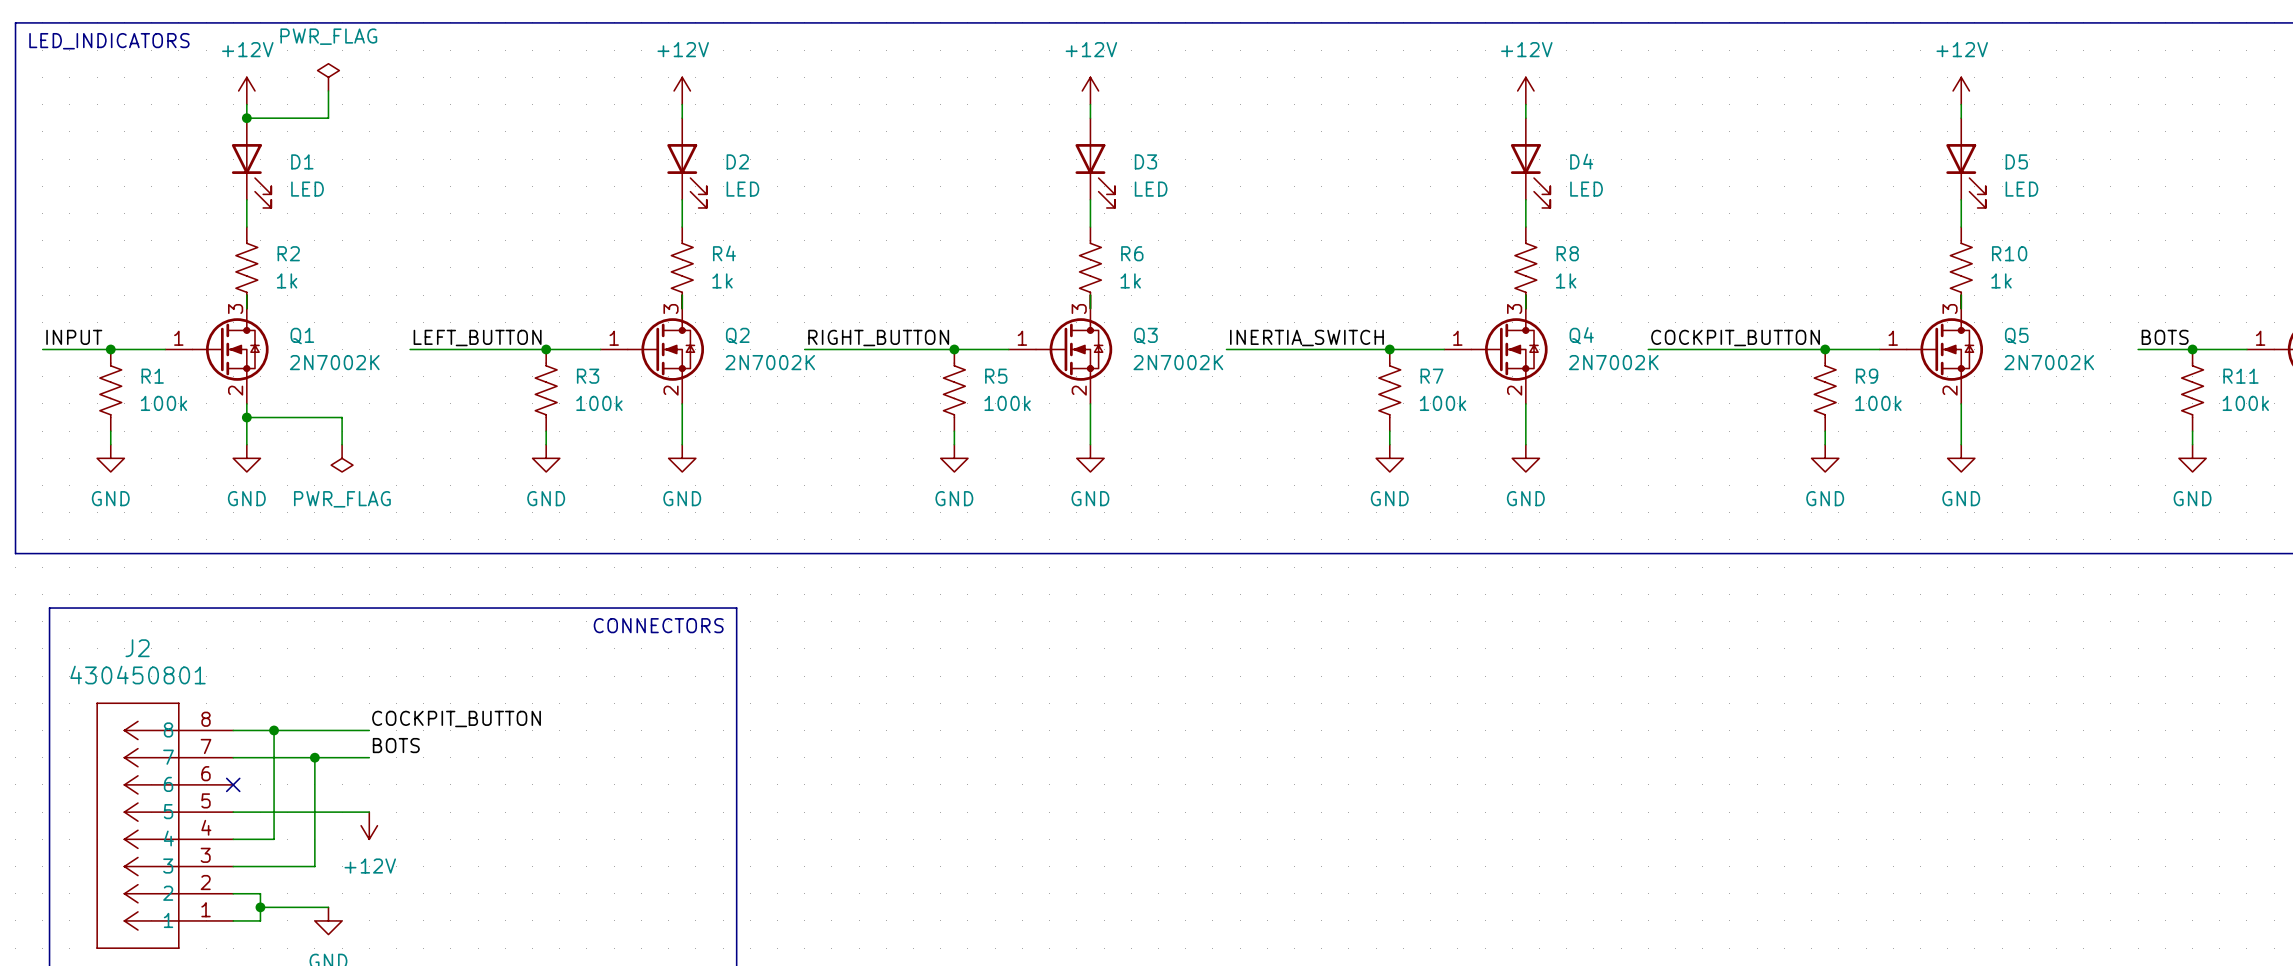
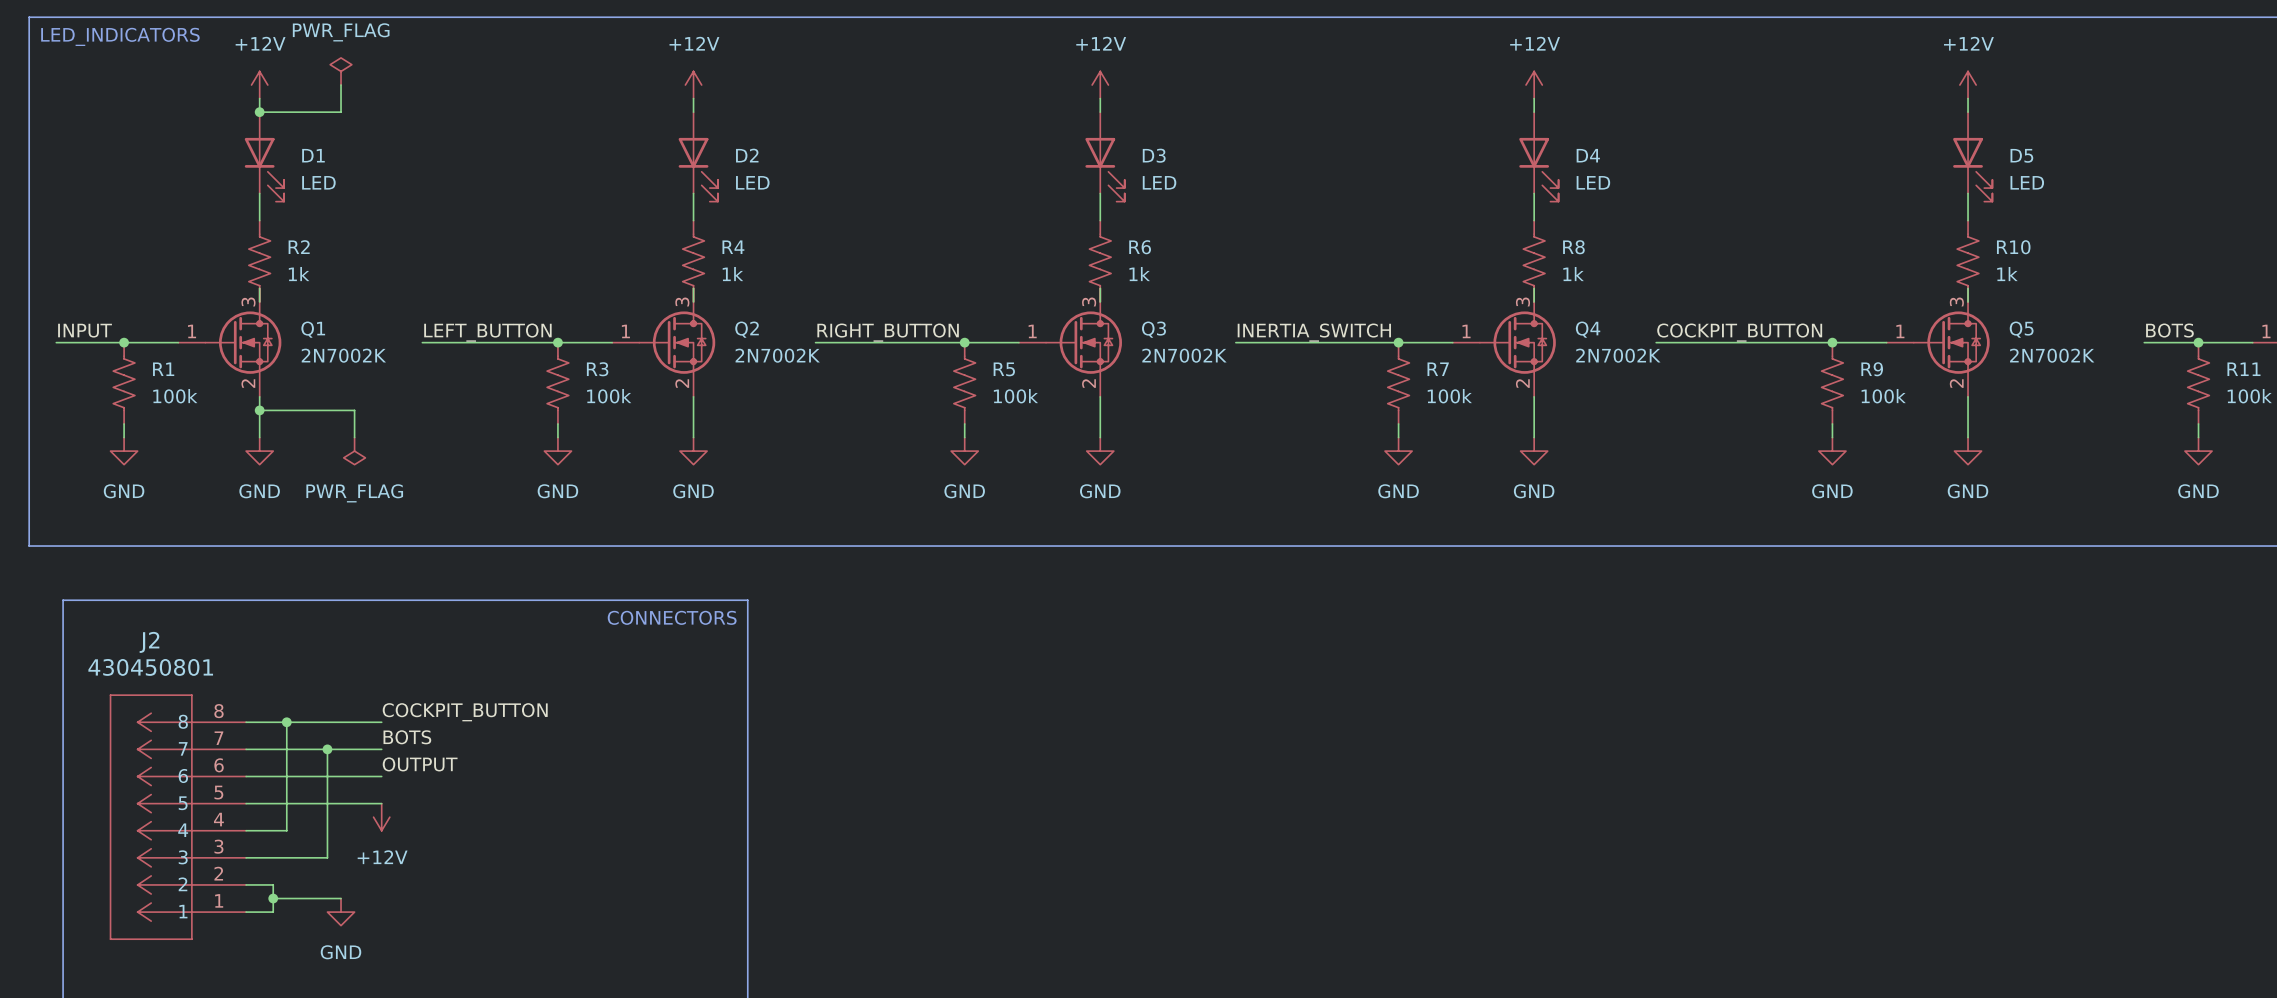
label: none -> OUTPUT (420, 764)
wire: none -> (246, 776) (381, 776)
no-connect mark: (233, 784) -> none

